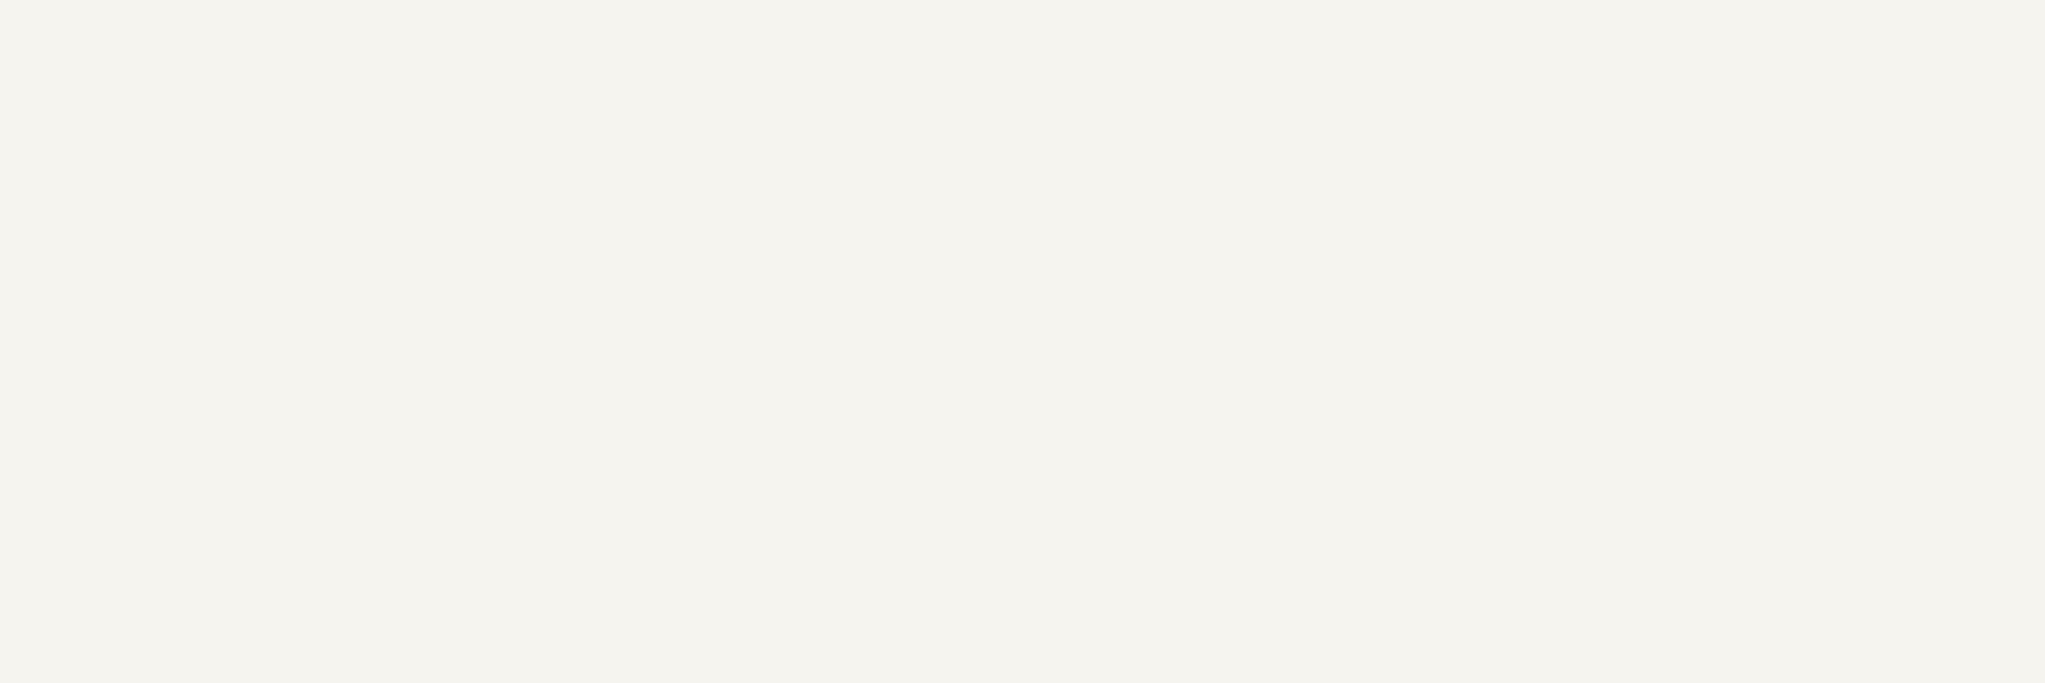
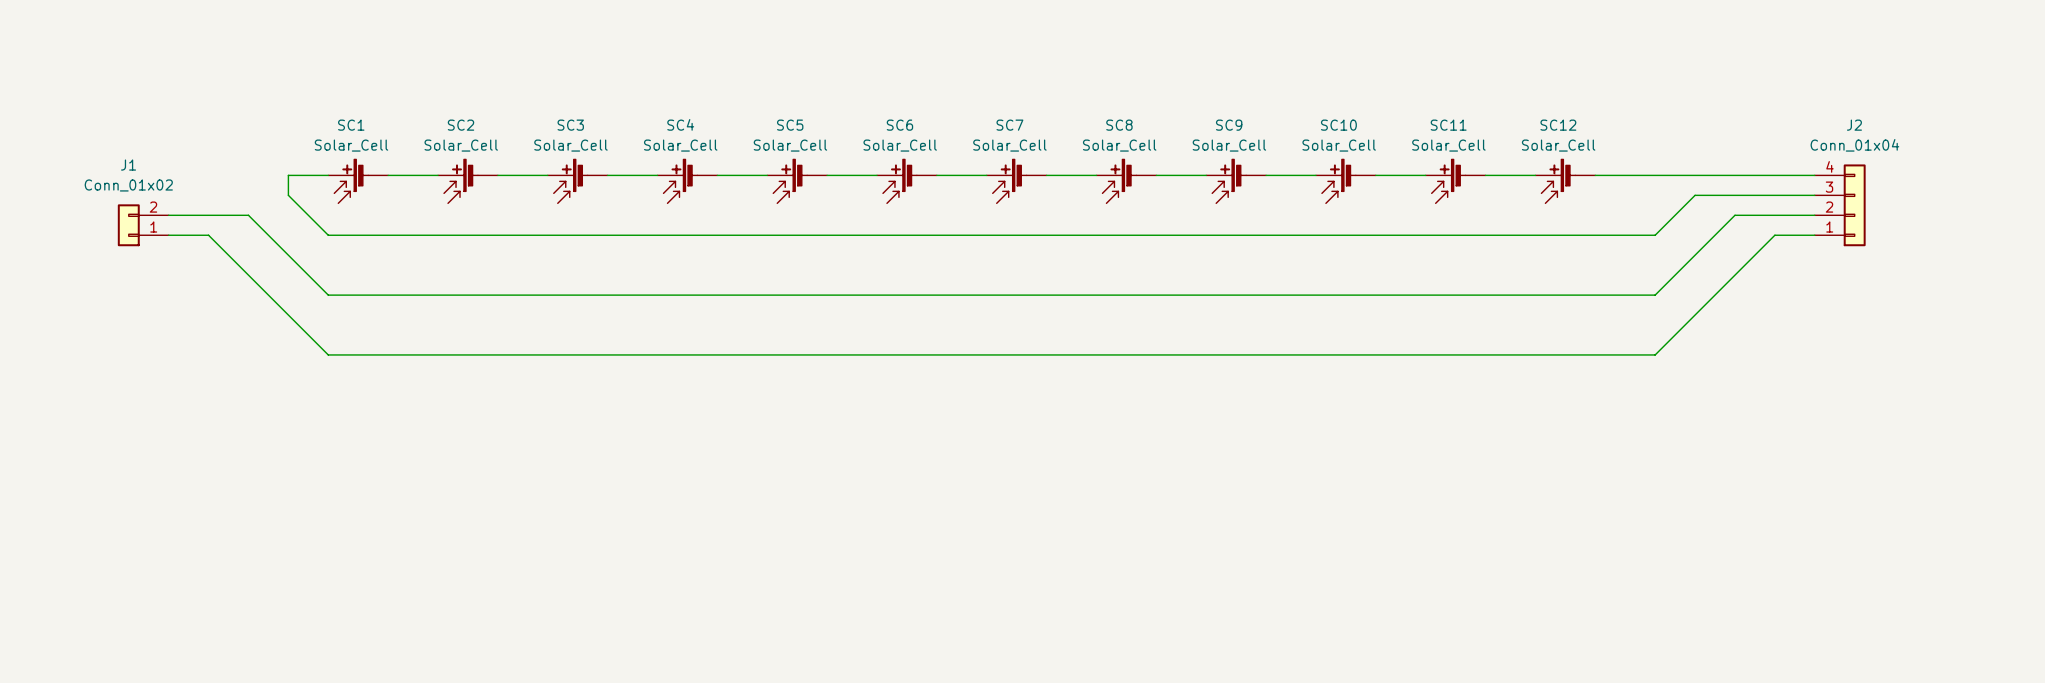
wire: none -> (328, 175) (288, 175) (288, 195) (328, 235) (1655, 235) (1695, 195) (1814, 195)
wire: none -> (388, 175) (438, 175)
wire: none -> (497, 175) (547, 175)
wire: none -> (607, 175) (657, 175)
wire: none -> (717, 175) (767, 175)
wire: none -> (827, 175) (877, 175)
wire: none -> (936, 175) (986, 175)
wire: none -> (1046, 175) (1096, 175)
wire: none -> (1156, 175) (1206, 175)
wire: none -> (1266, 175) (1315, 175)
wire: none -> (1375, 175) (1425, 175)
wire: none -> (1485, 175) (1535, 175)
wire: none -> (1595, 175) (1814, 175)
SC1: none -> Solar_Cell (358, 181)
SC2: none -> Solar_Cell (467, 181)
SC3: none -> Solar_Cell (577, 181)
SC4: none -> Solar_Cell (687, 181)
SC5: none -> Solar_Cell (797, 181)
SC6: none -> Solar_Cell (906, 181)
SC7: none -> Solar_Cell (1016, 181)
SC8: none -> Solar_Cell (1126, 181)
SC9: none -> Solar_Cell (1236, 181)
SC10: none -> Solar_Cell (1345, 181)
SC11: none -> Solar_Cell (1455, 181)
SC12: none -> Solar_Cell (1565, 181)
J2: none -> Conn_01x04 (1840, 205)
wire: none -> (168, 215) (248, 215) (328, 295) (1655, 295) (1734, 215) (1814, 215)
J1: none -> Conn_01x02 (143, 225)
wire: none -> (168, 235) (208, 235) (328, 354) (1655, 354) (1774, 235) (1814, 235)

